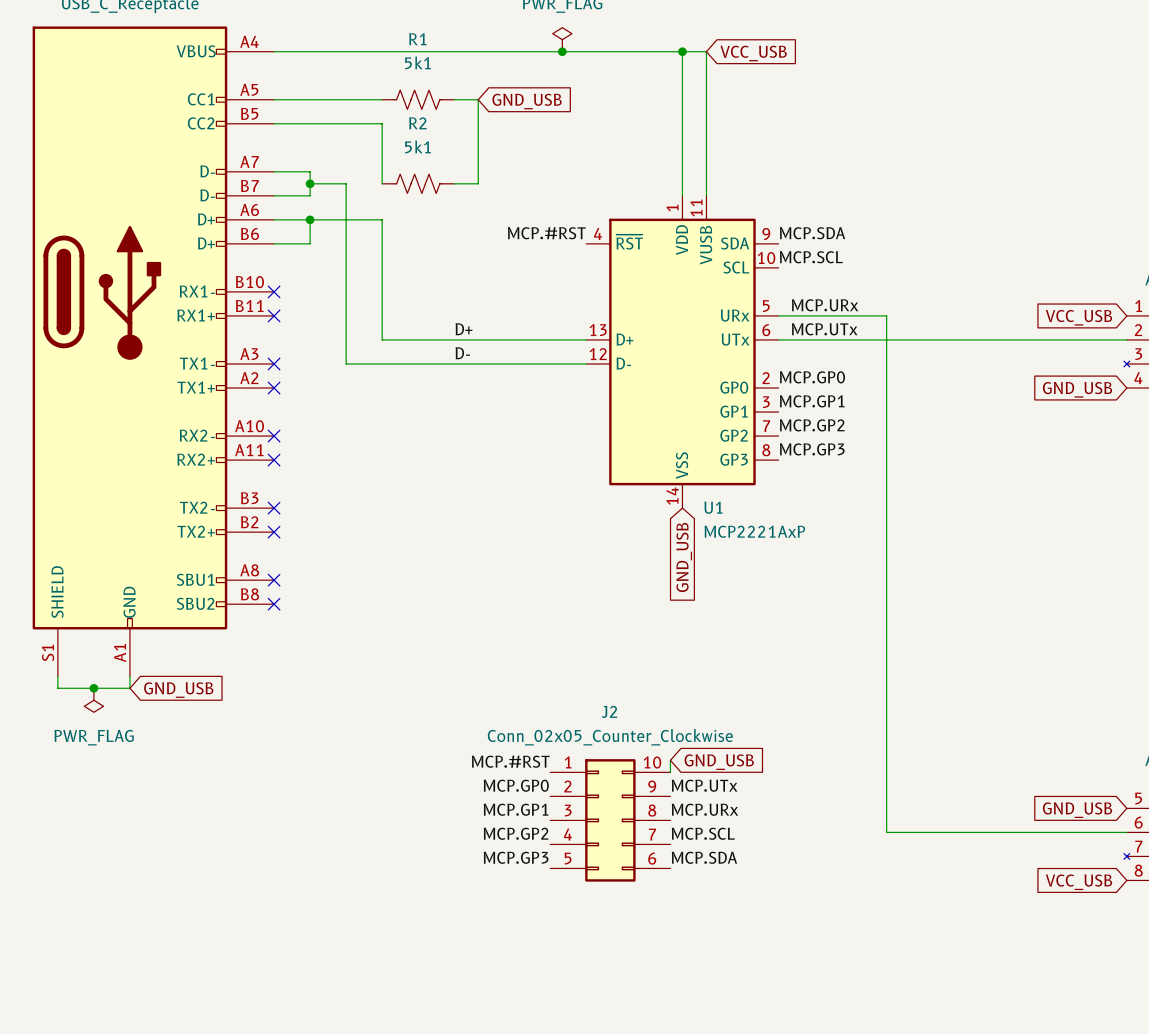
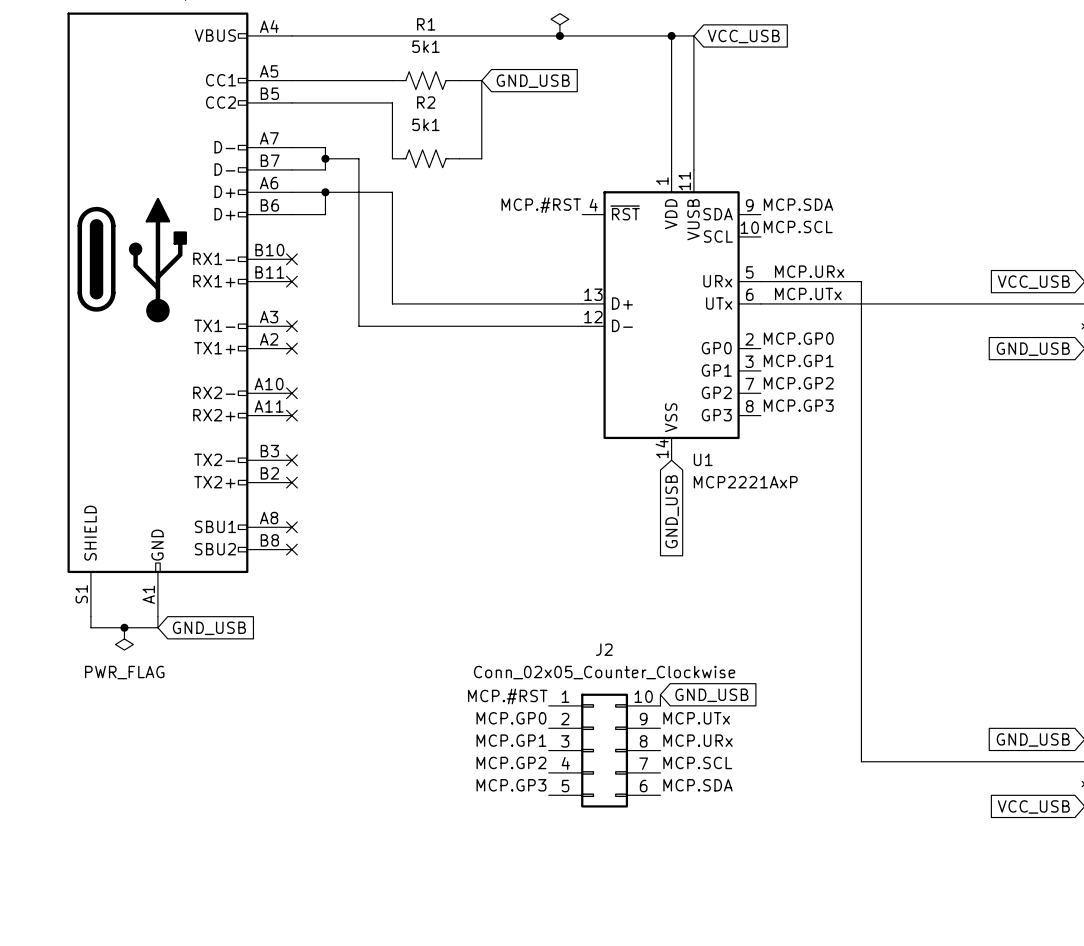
label: D+ (464, 329) -> none
label: D- (462, 353) -> none

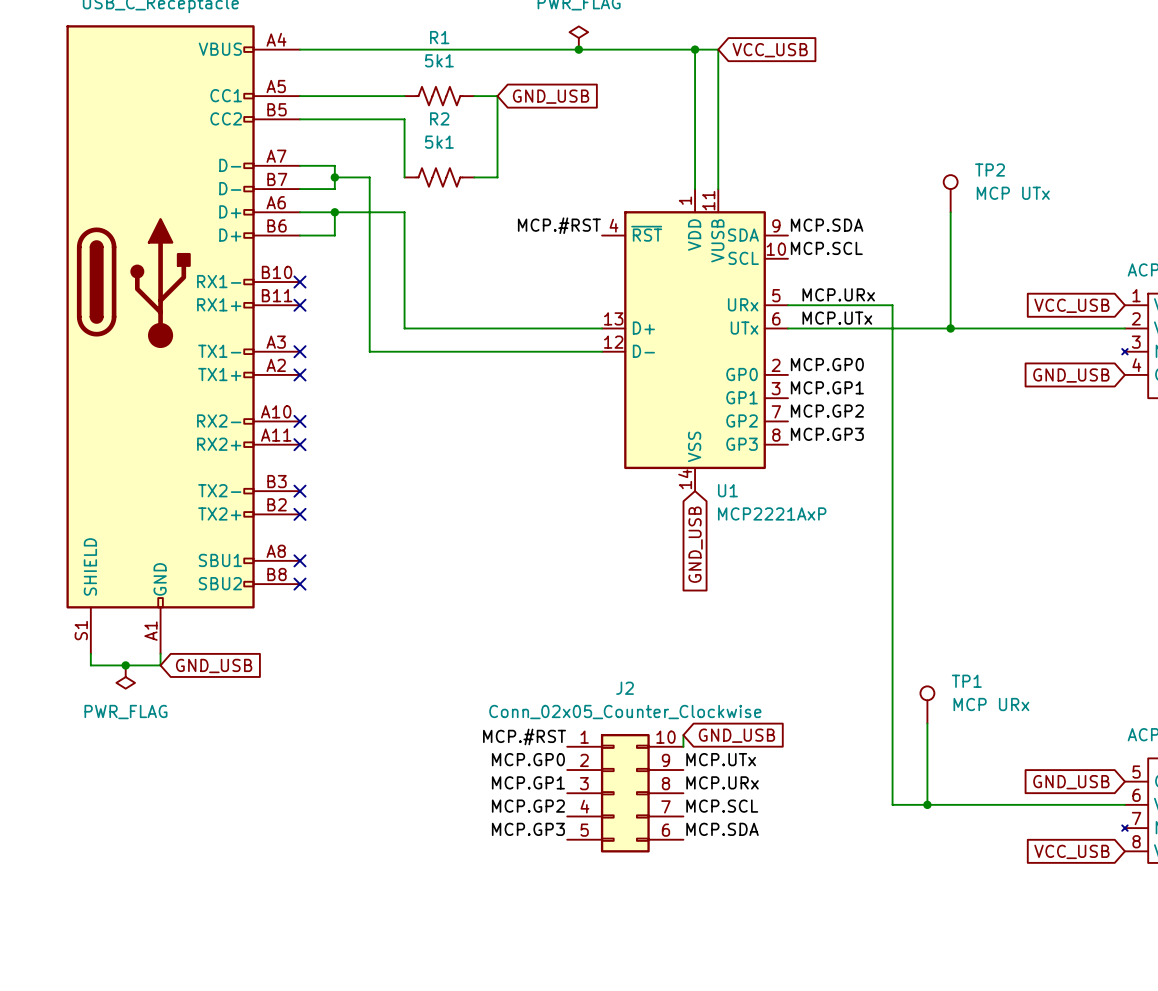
TP2: none -> MCP UTx (950, 193)
wire: none -> (950, 212) (950, 328)
junction: none -> (950, 328)
TP1: none -> MCP URx (927, 704)
wire: none -> (927, 723) (927, 804)
junction: none -> (927, 804)

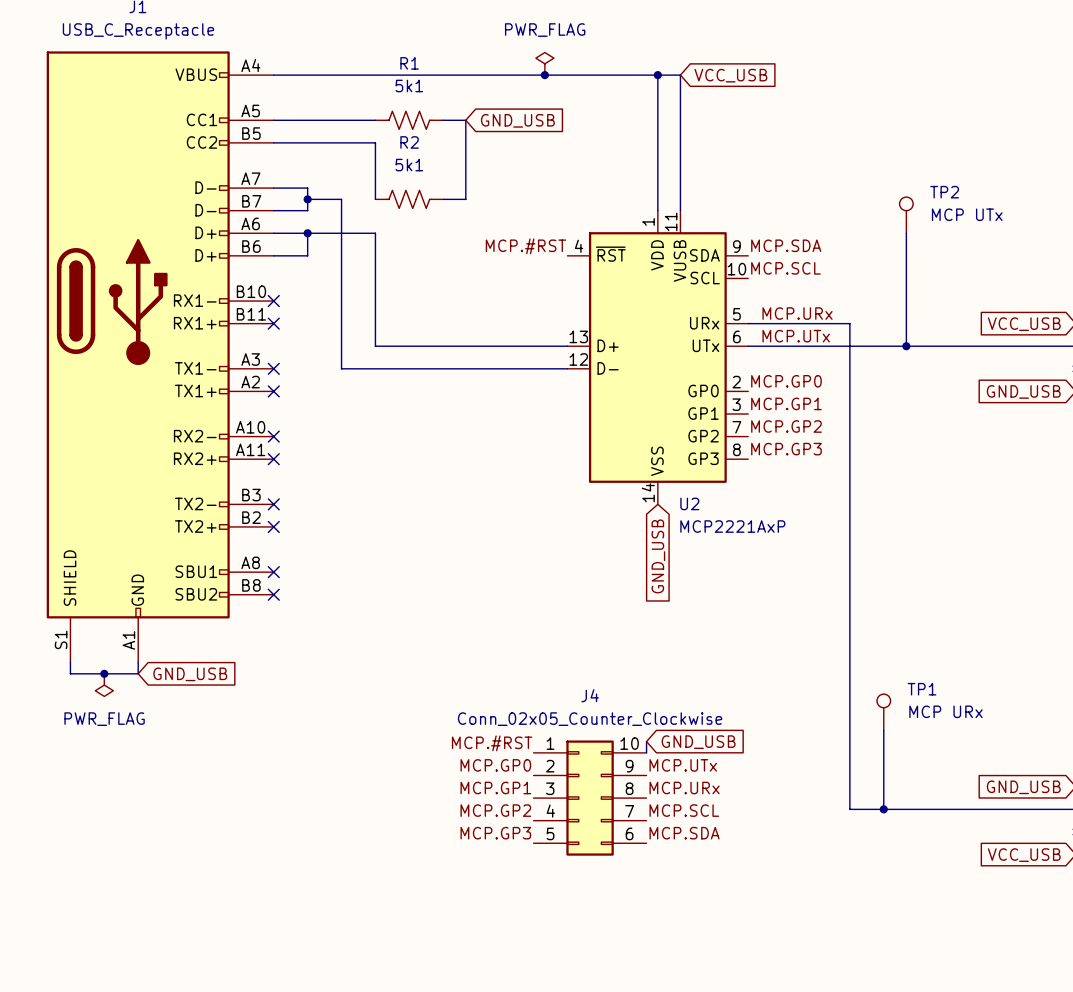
U1 name: U1 (727, 490) -> U2 (689, 503)
J2 name: J2 (625, 688) -> J4 (590, 695)

